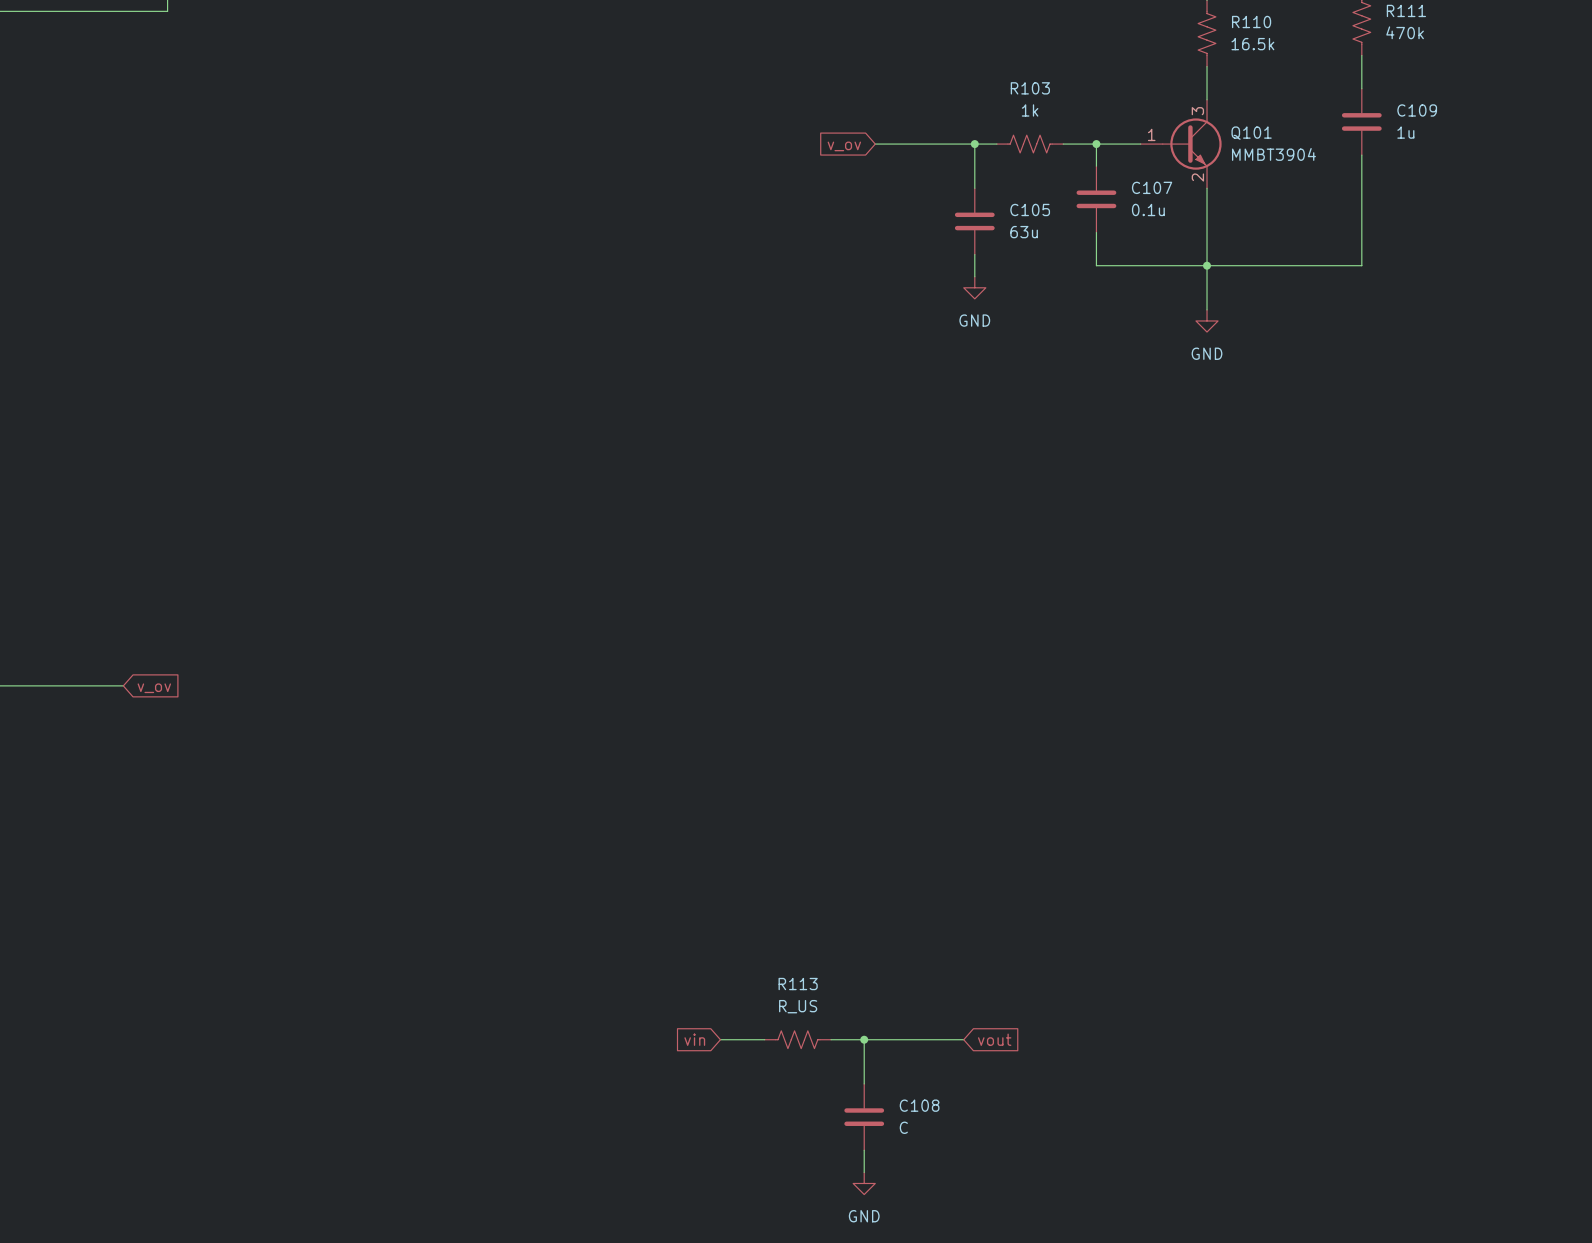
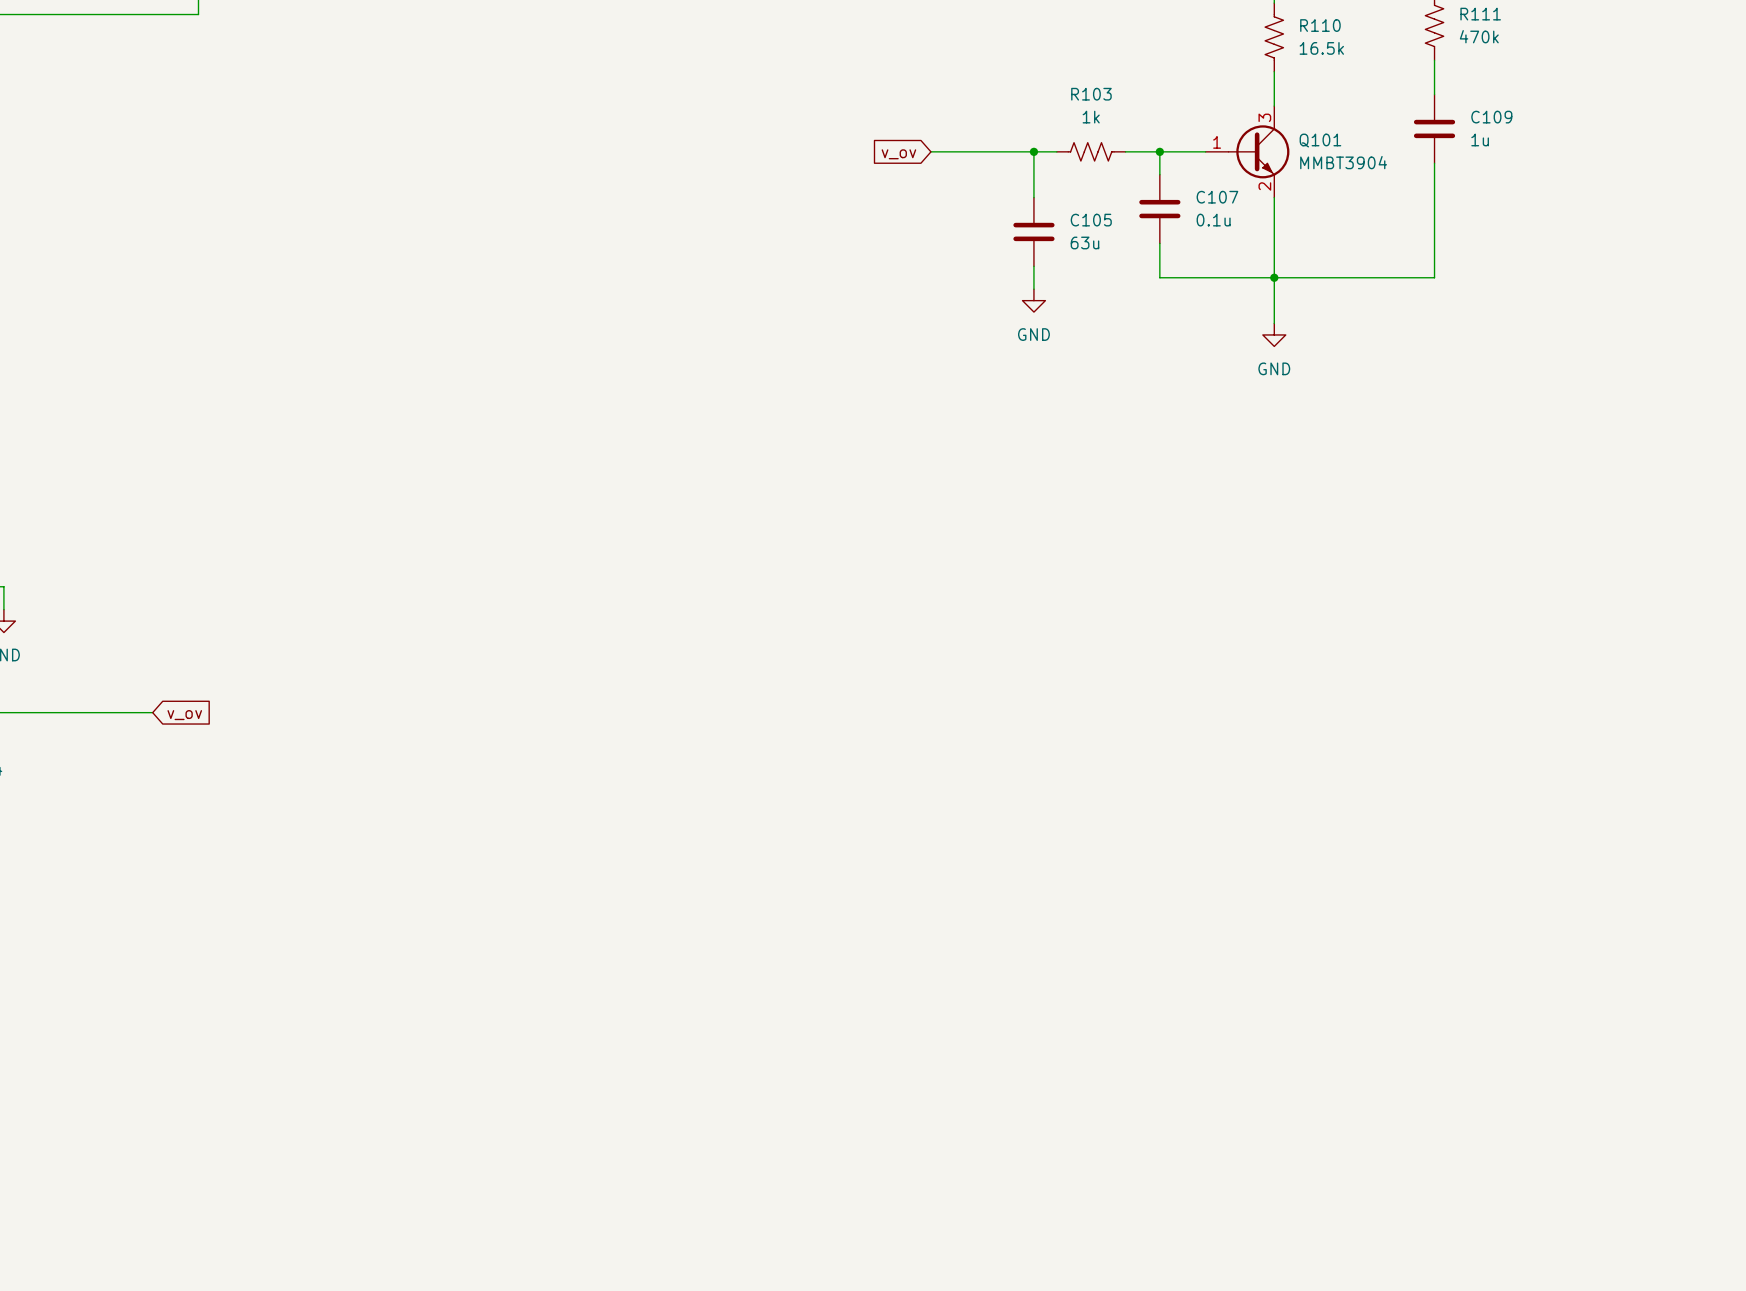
global label: vin (694, 1039) -> none
wire: (720, 1039) (764, 1039) -> none
R113: R_US (797, 1039) -> none
wire: (831, 1039) (963, 1039) -> none
wire: (864, 1039) (864, 1083) -> none
junction: (864, 1039) -> none
global label: vout (994, 1039) -> none
C108: C (864, 1117) -> none
wire: (864, 1150) (864, 1172) -> none
power symbol: GND (864, 1183) -> none

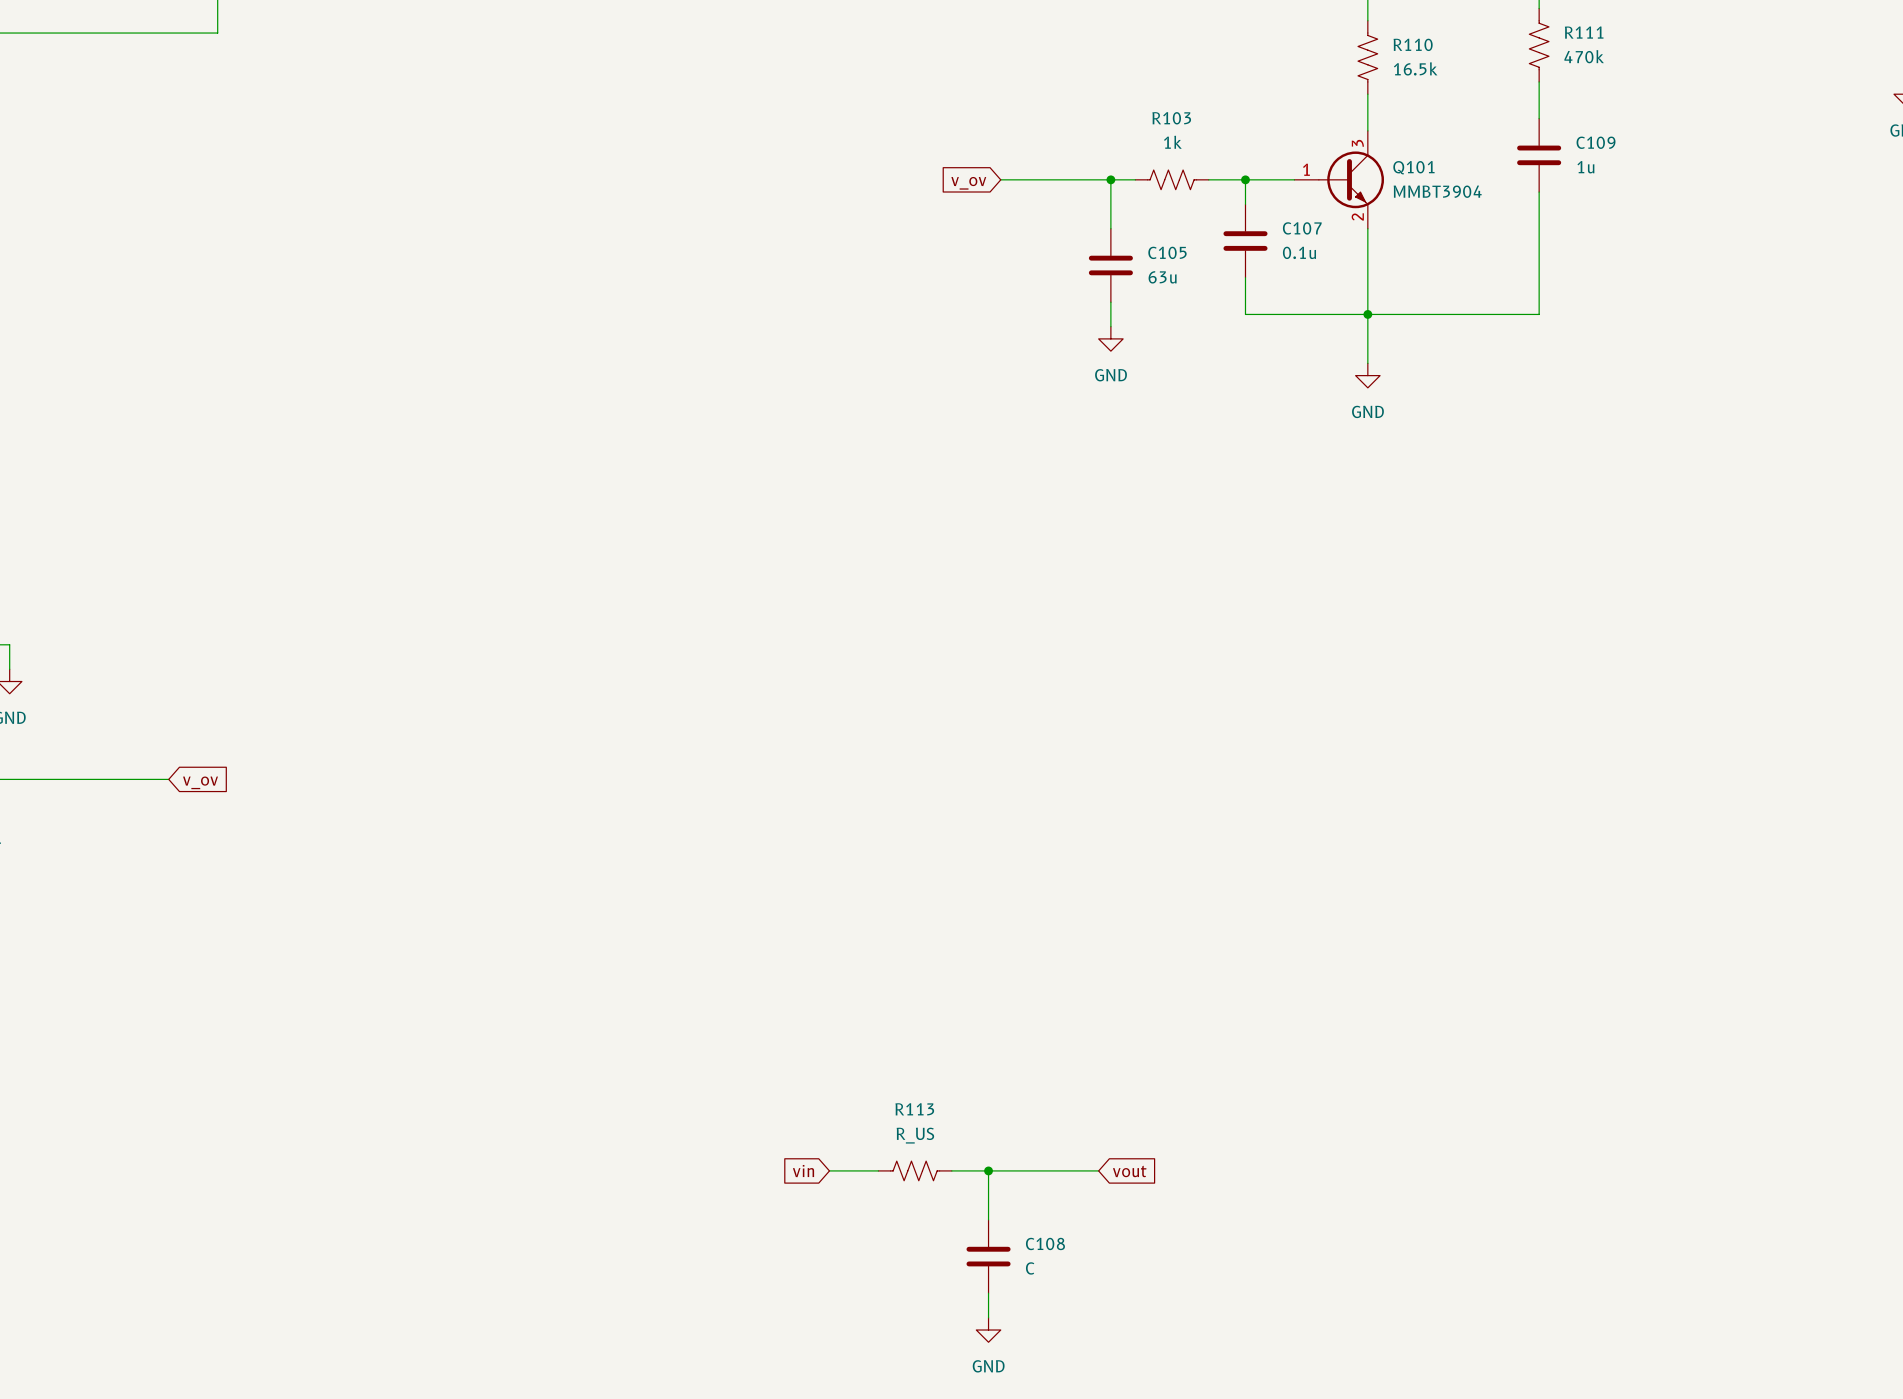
global label: none -> vin (803, 1171)
wire: none -> (829, 1170) (878, 1170)
R113: none -> R_US (915, 1170)
wire: none -> (951, 1170) (1098, 1170)
wire: none -> (988, 1170) (988, 1219)
junction: none -> (988, 1170)
global label: none -> vout (1129, 1171)
C108: none -> C (988, 1256)
wire: none -> (988, 1293) (988, 1317)
power symbol: none -> GND (988, 1330)

